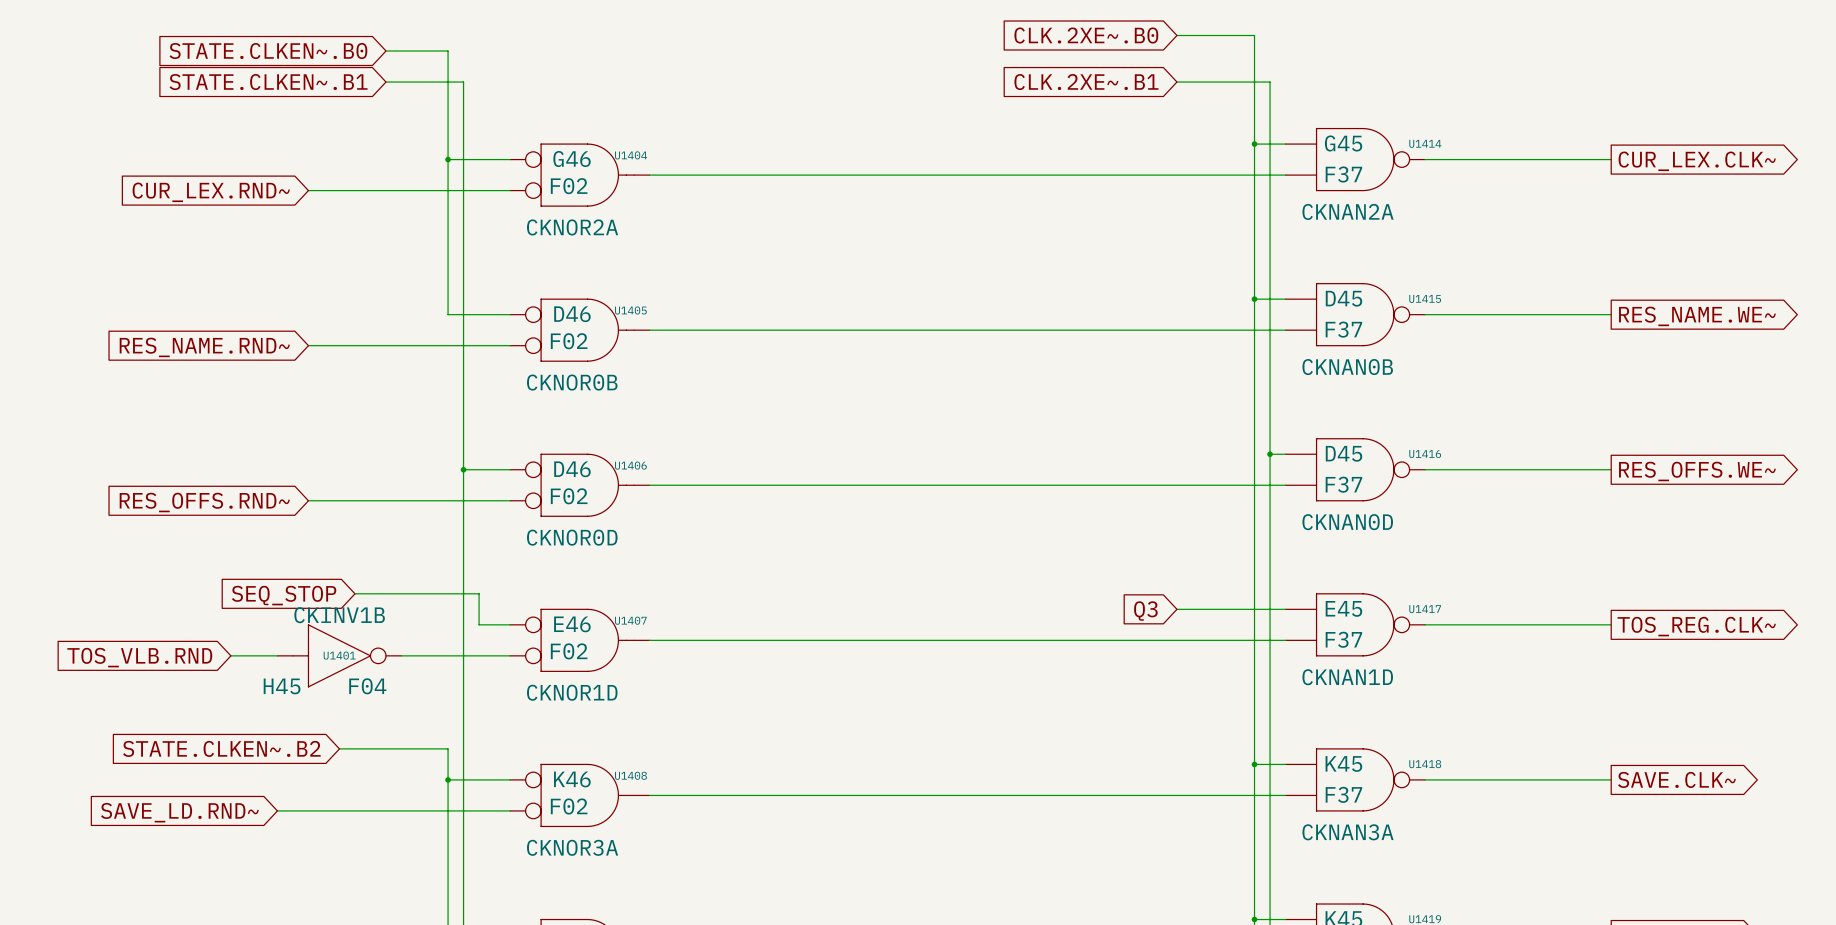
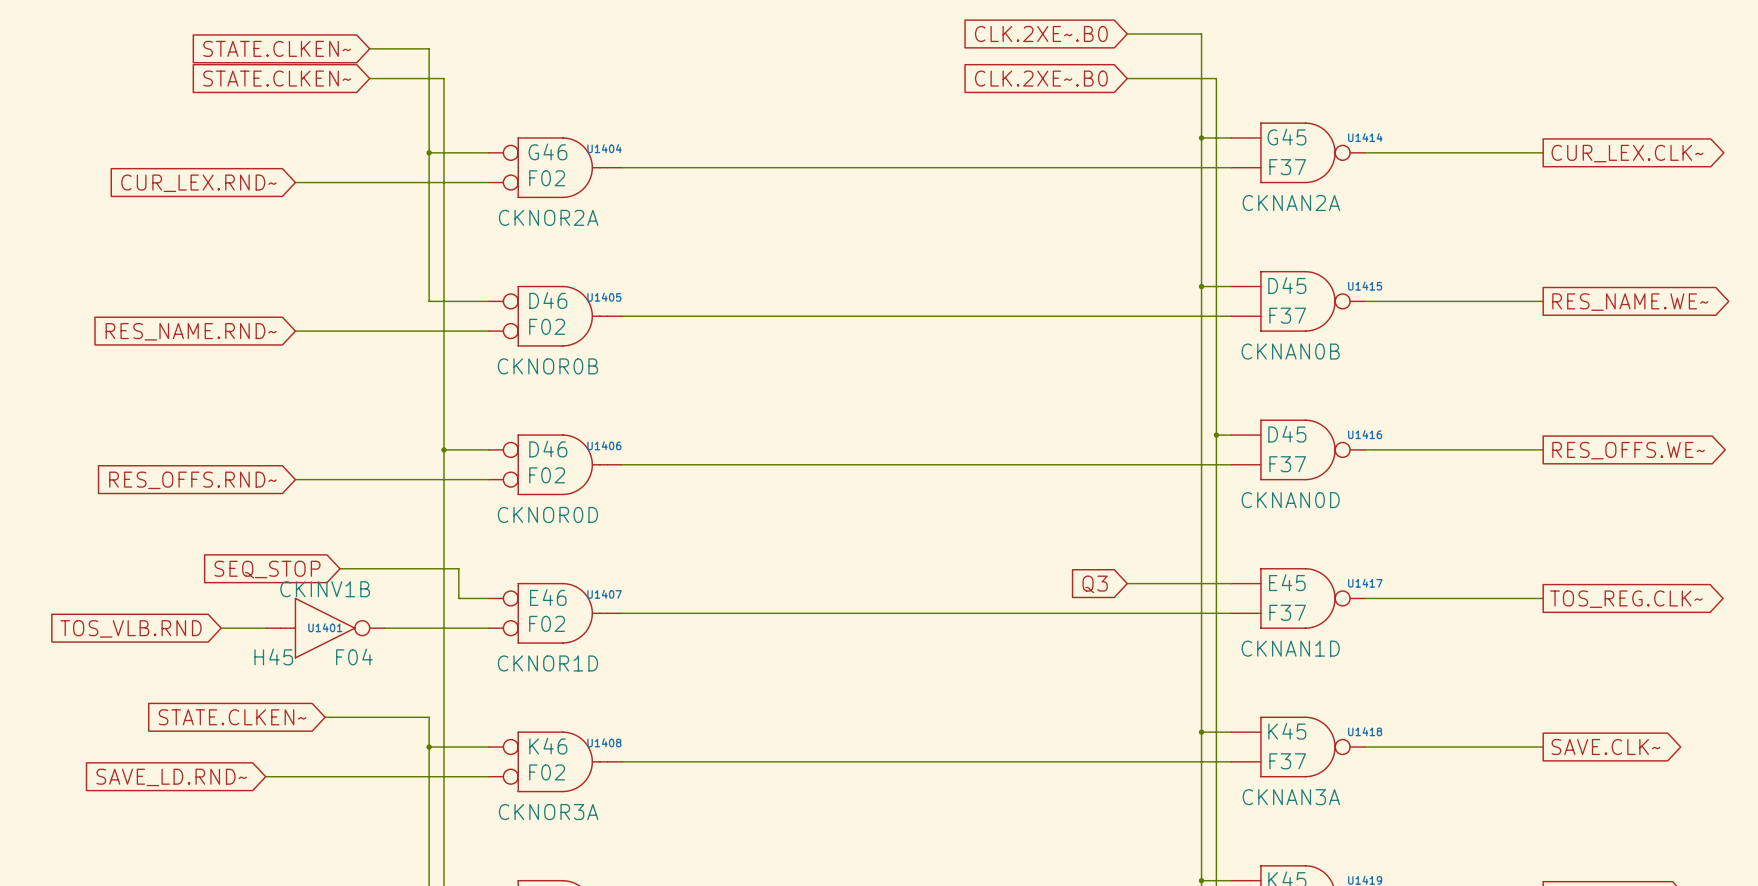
global label: STATE.CLKEN~.B0 (268, 51) -> STATE.CLKEN~ (277, 48)
global label: STATE.CLKEN~.B1 (268, 82) -> STATE.CLKEN~ (277, 78)
global label: CLK.2XE~.B1 (1086, 82) -> CLK.2XE~.B0 (1041, 78)
global label: STATE.CLKEN~.B2 (221, 748) -> STATE.CLKEN~ (232, 717)

